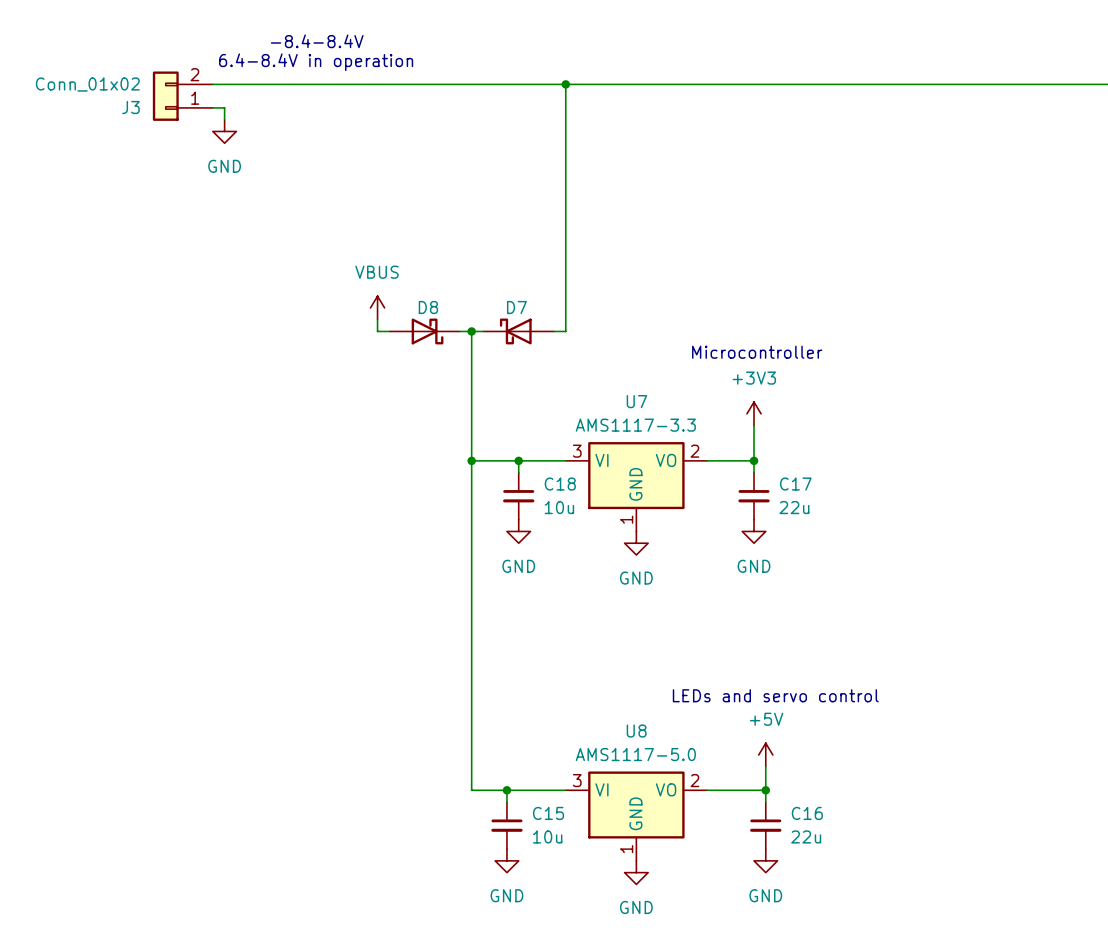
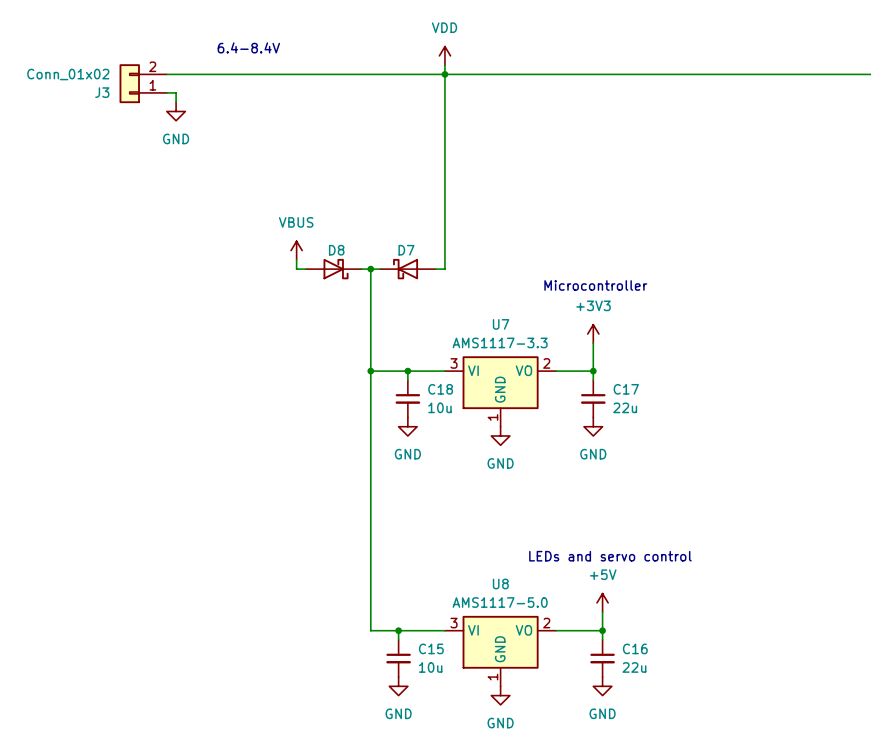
text: -8.4-8.4V (317, 41) -> 6.4-8.4V (248, 47)
power symbol: none -> VDD (444, 55)
text: 6.4-8.4V in operation (316, 62) -> none
wire: none -> (444, 65) (444, 74)

